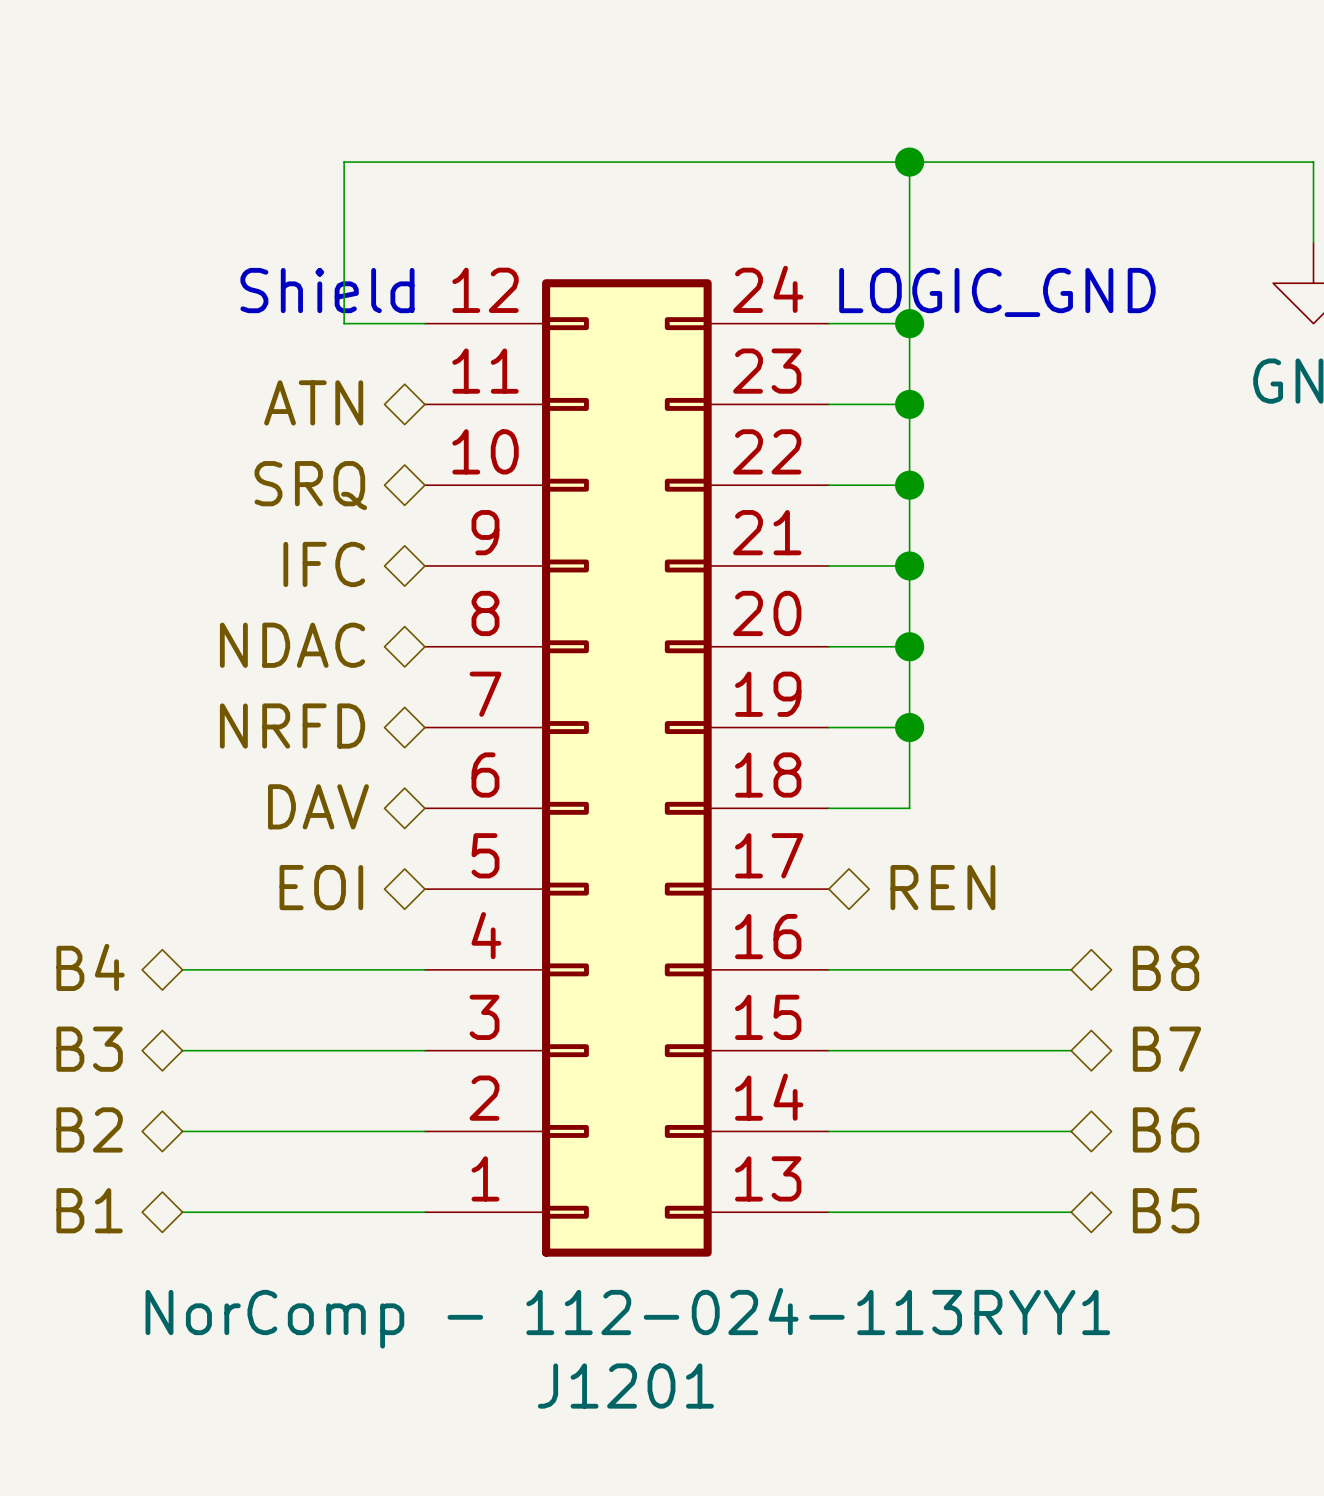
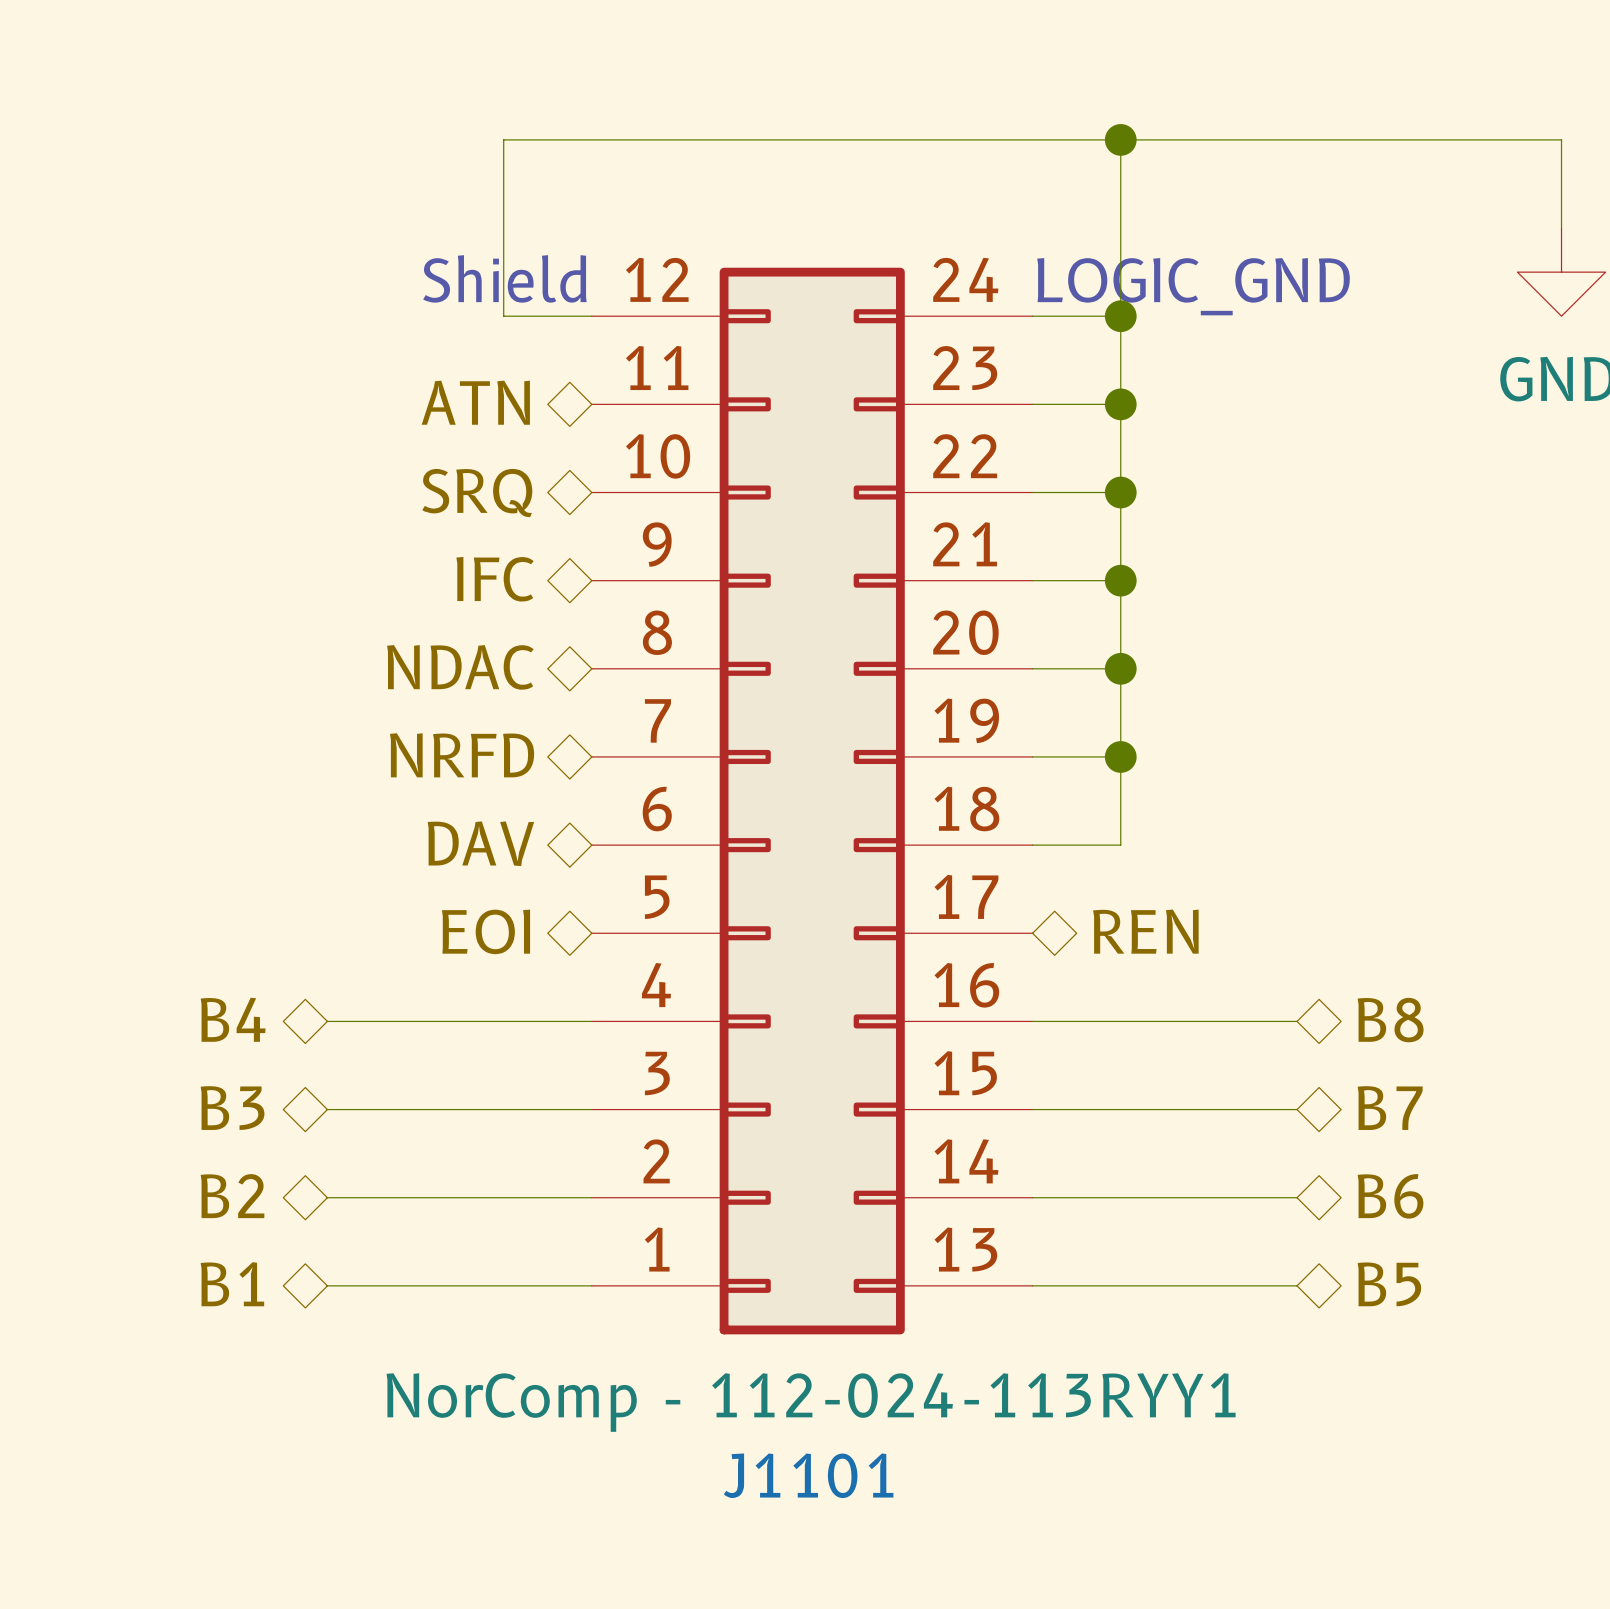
J1201 name: J1201 (625, 1386) -> J1101 (808, 1475)

